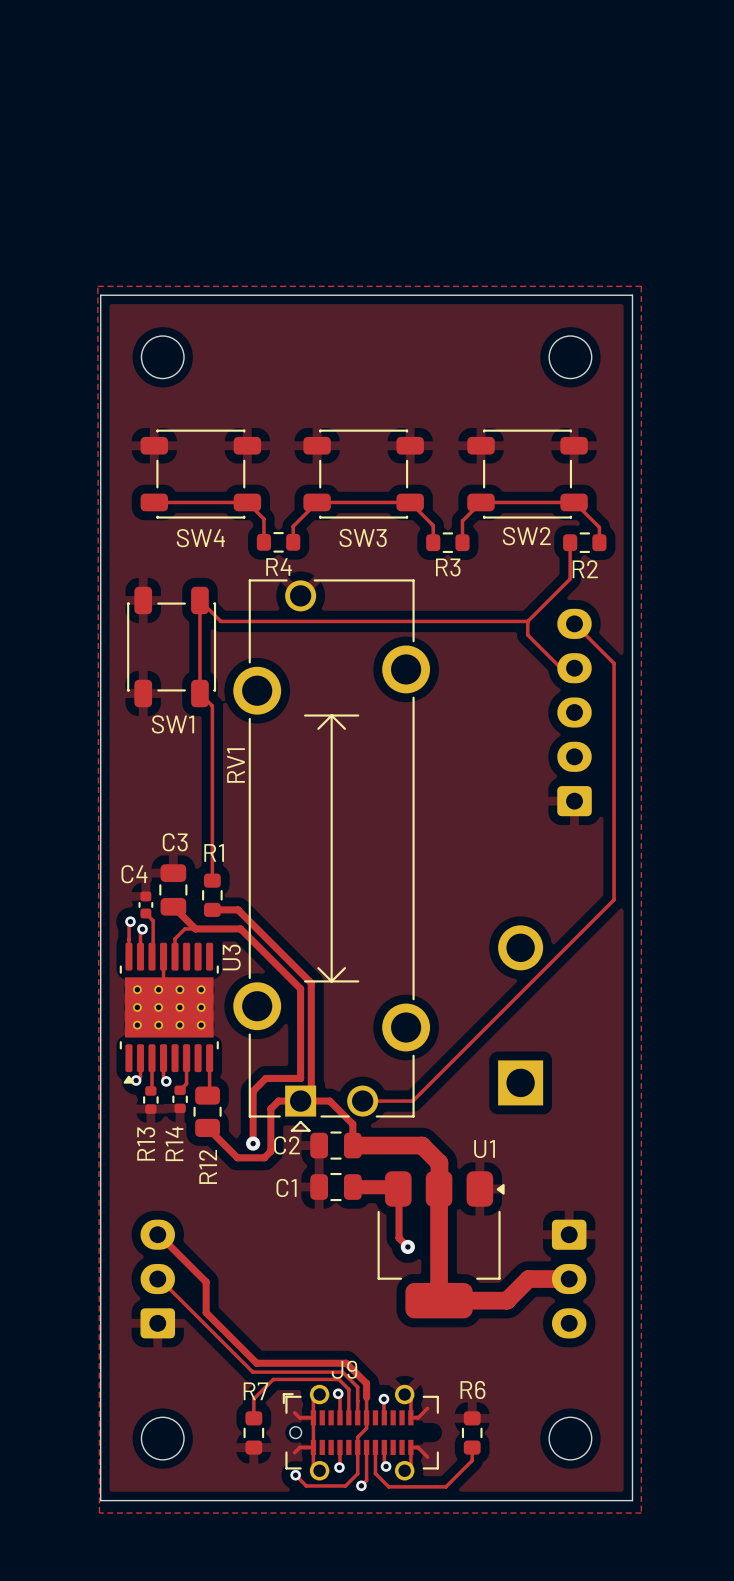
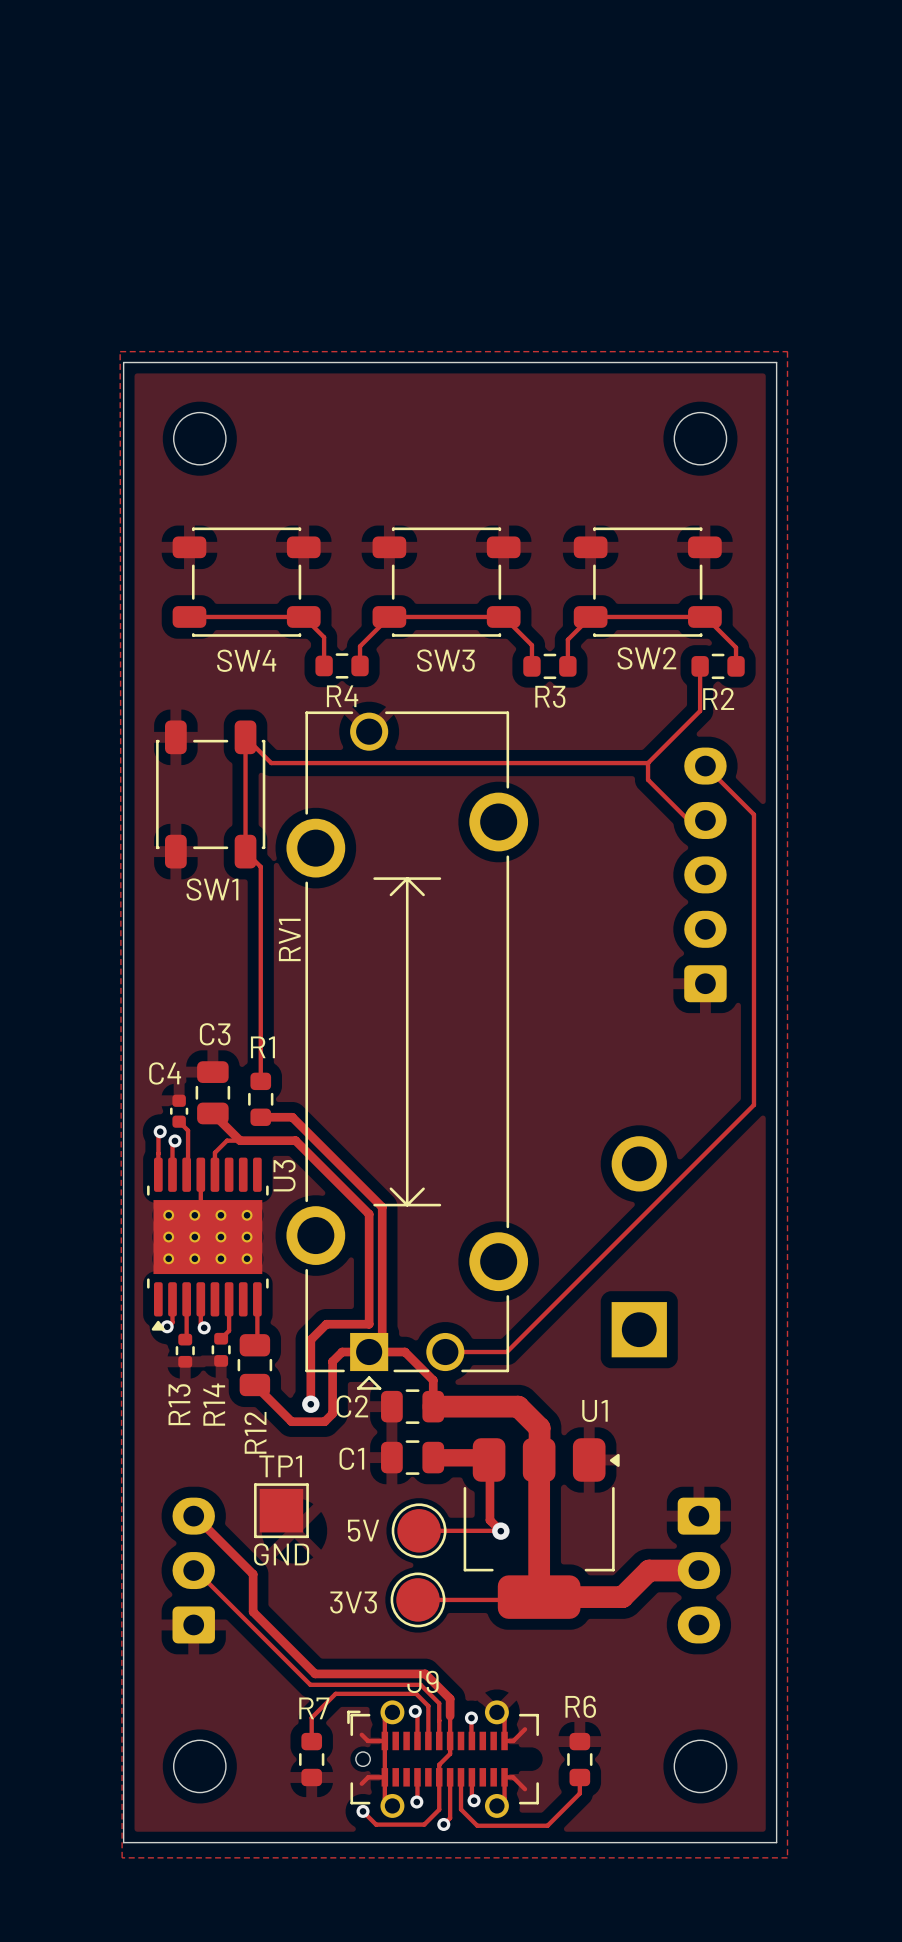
TP1: none -> GND (281, 1510)
track: none -> (419, 1530) (500, 1531)
part: none -> 5V (419, 1530)
track: none -> (416, 1596) (420, 1599) (536, 1599) (539, 1597)
part: none -> 3V3 (418, 1599)

